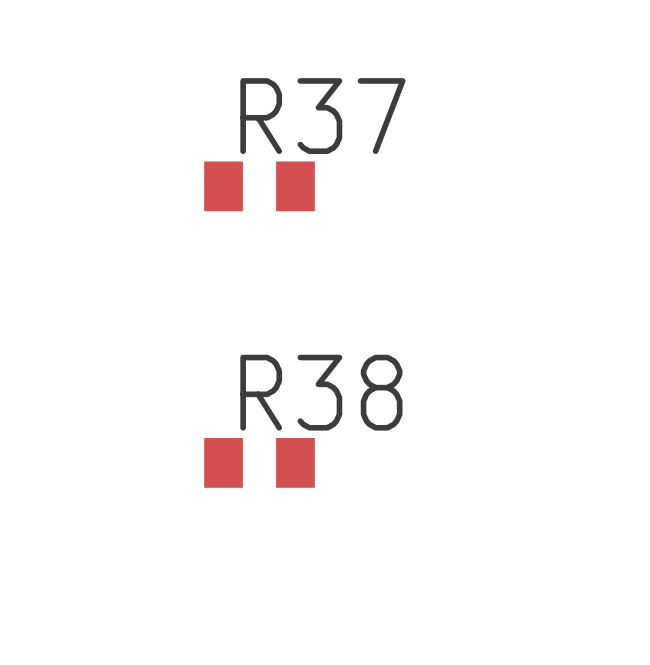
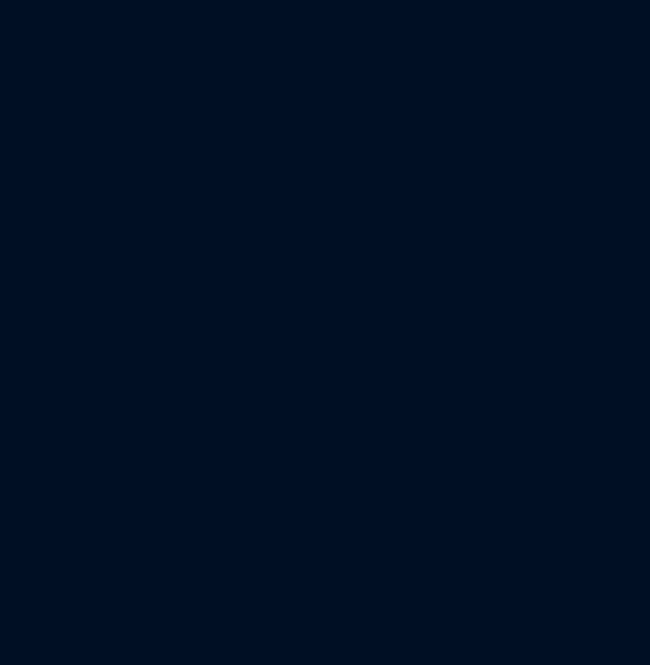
R37: (259, 186) -> none
R38: (259, 462) -> none

